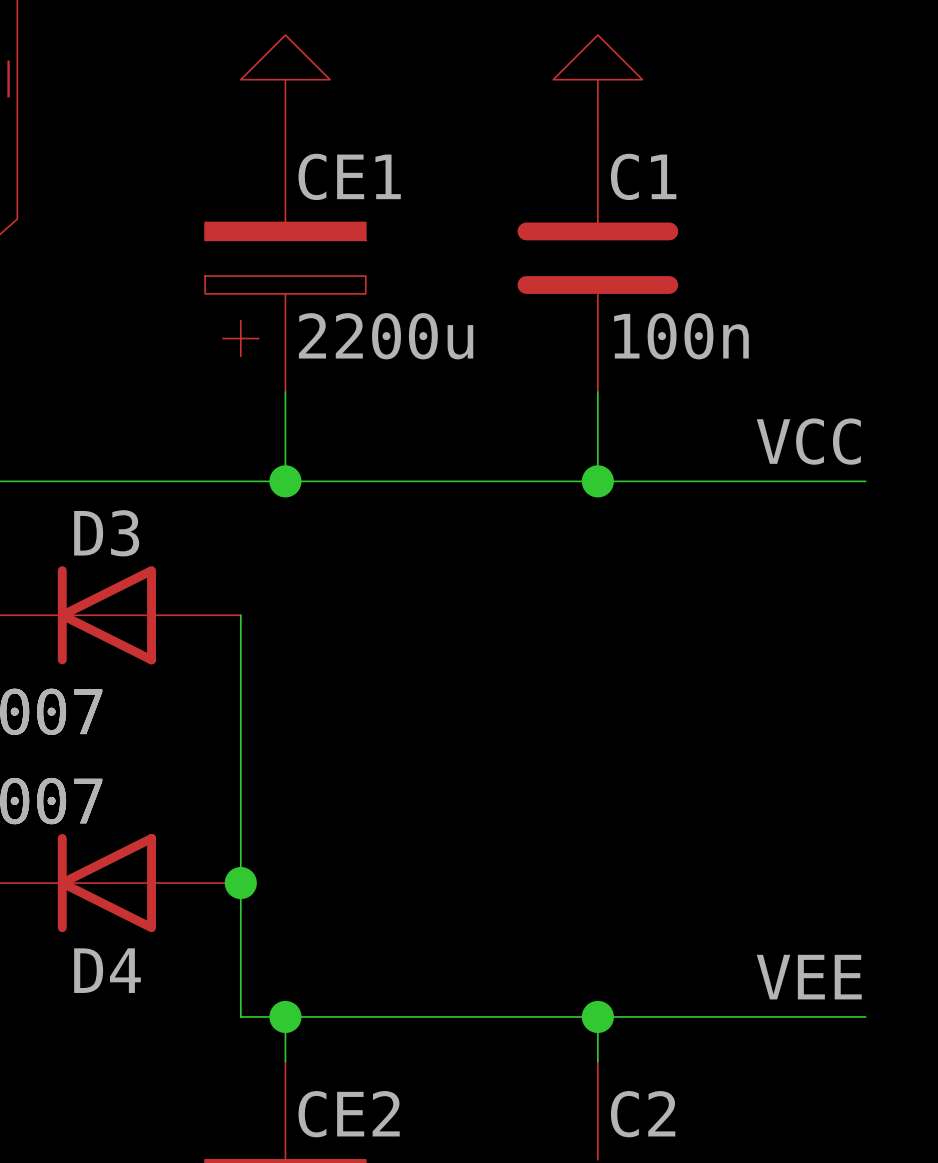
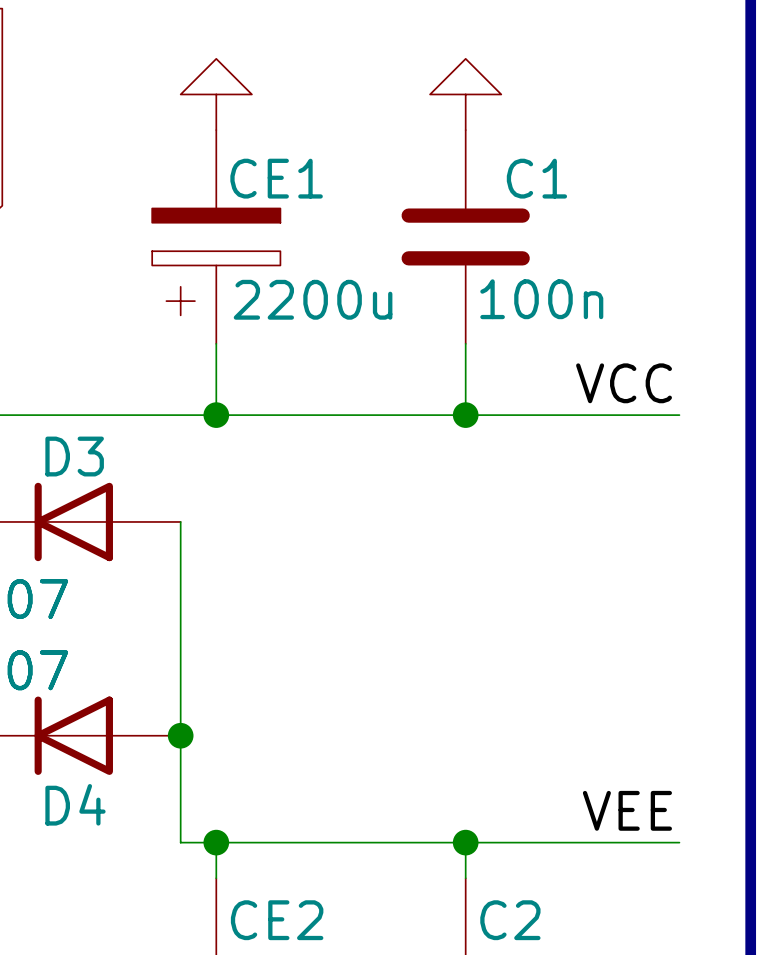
CE1 name position: CE1 (349, 176) -> CE1 (276, 178)
C1 name position: C1 (643, 176) -> C1 (536, 178)
CE1 value position: 2200u (386, 336) -> 2200u (313, 299)

